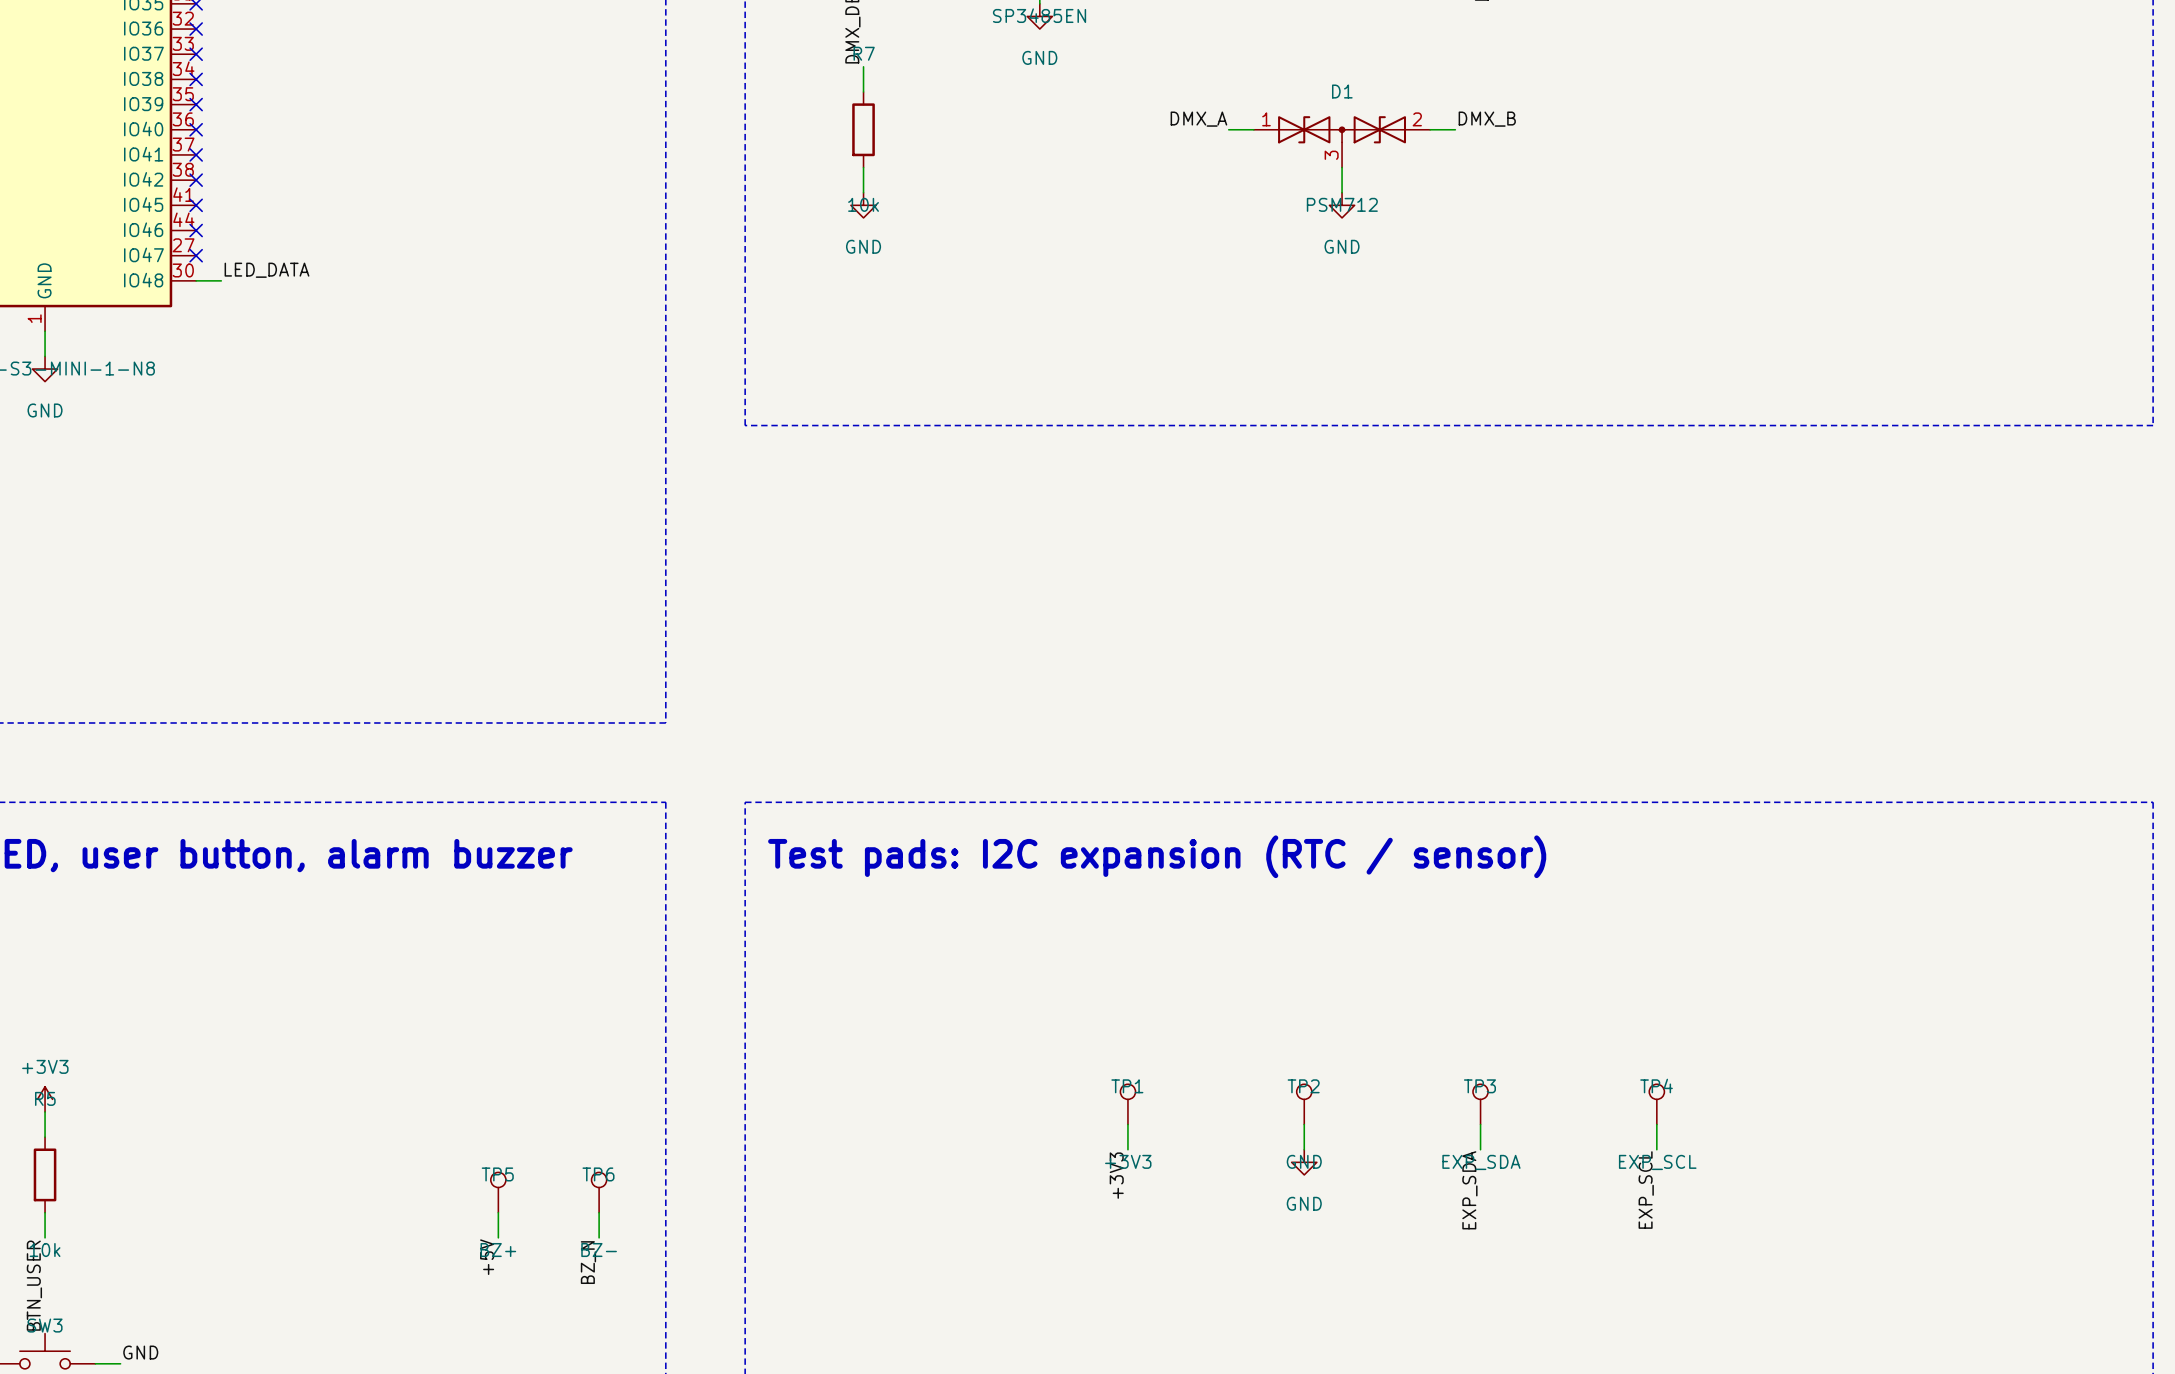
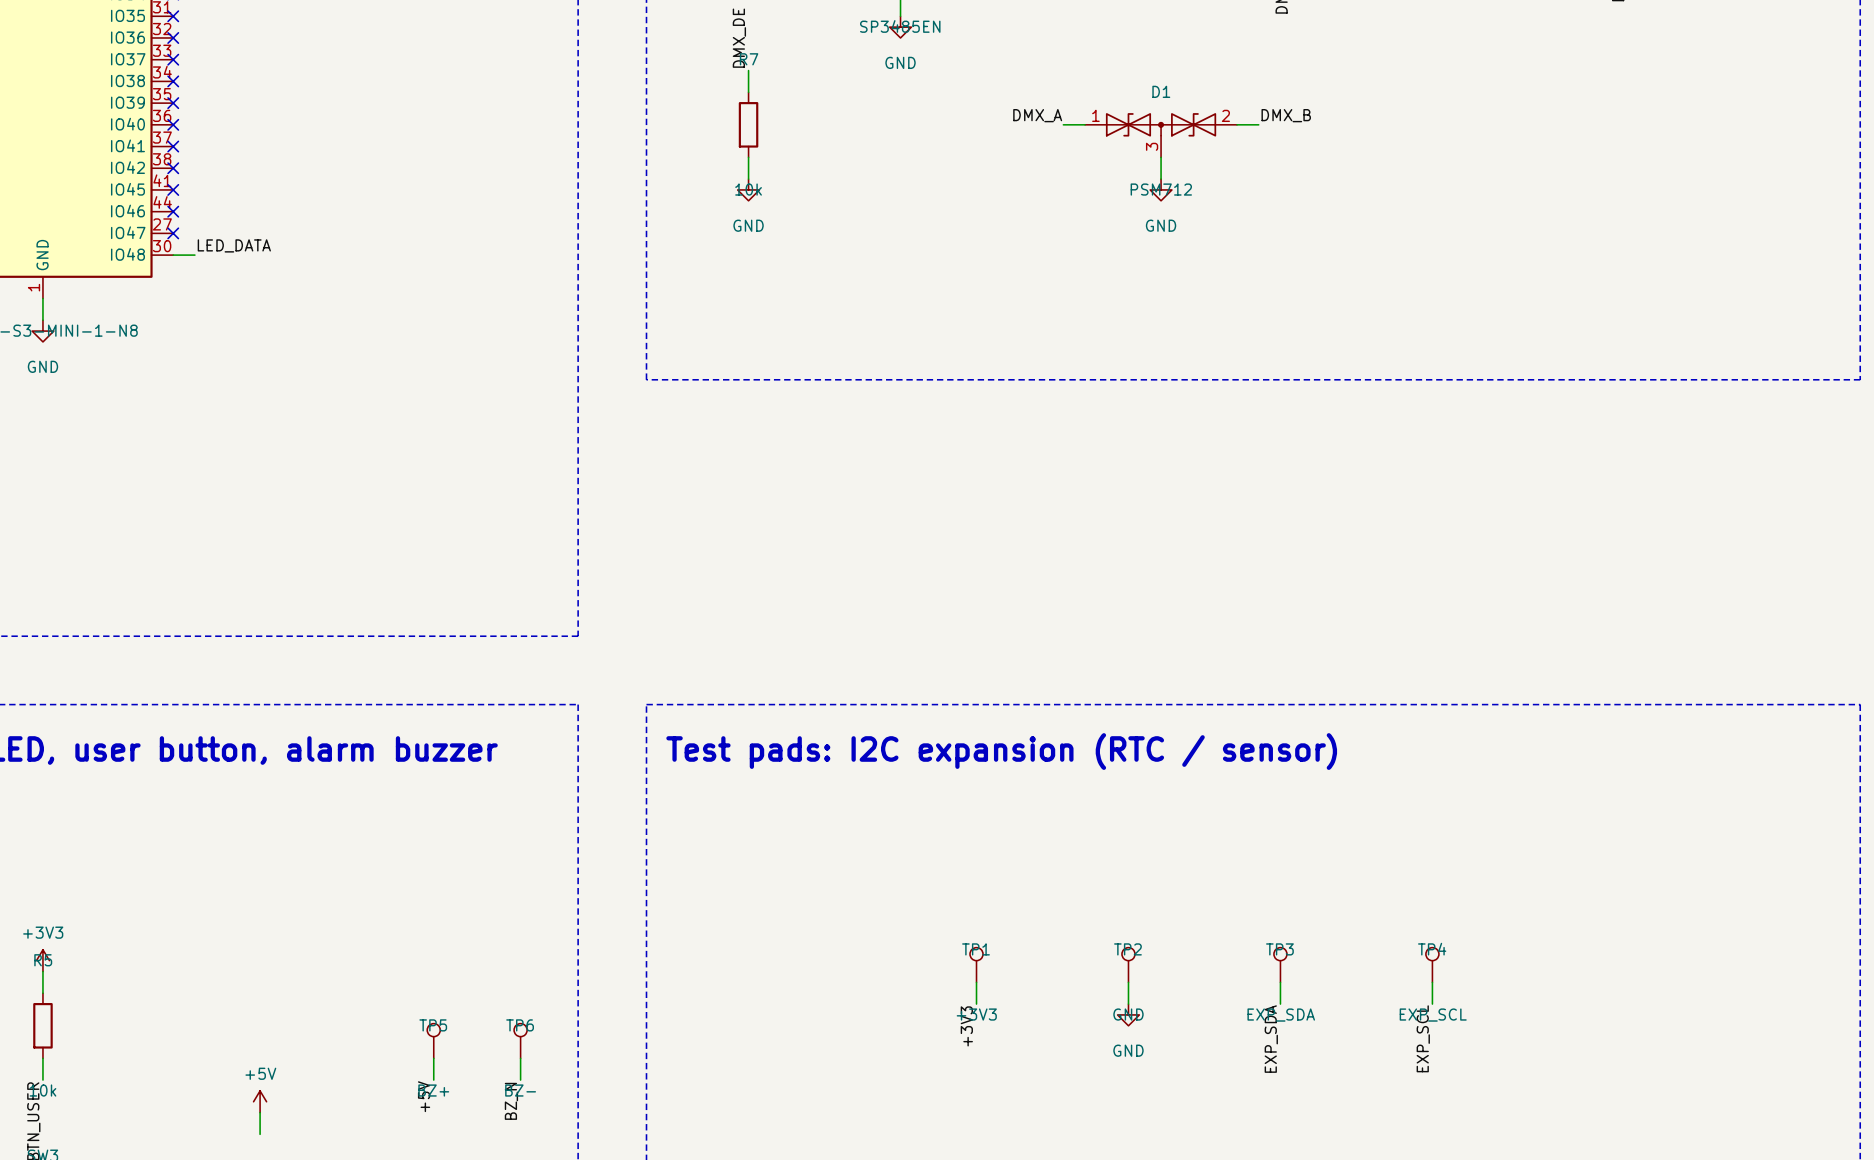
power symbol: none -> +5V (260, 1101)
wire: none -> (260, 1112) (260, 1134)

